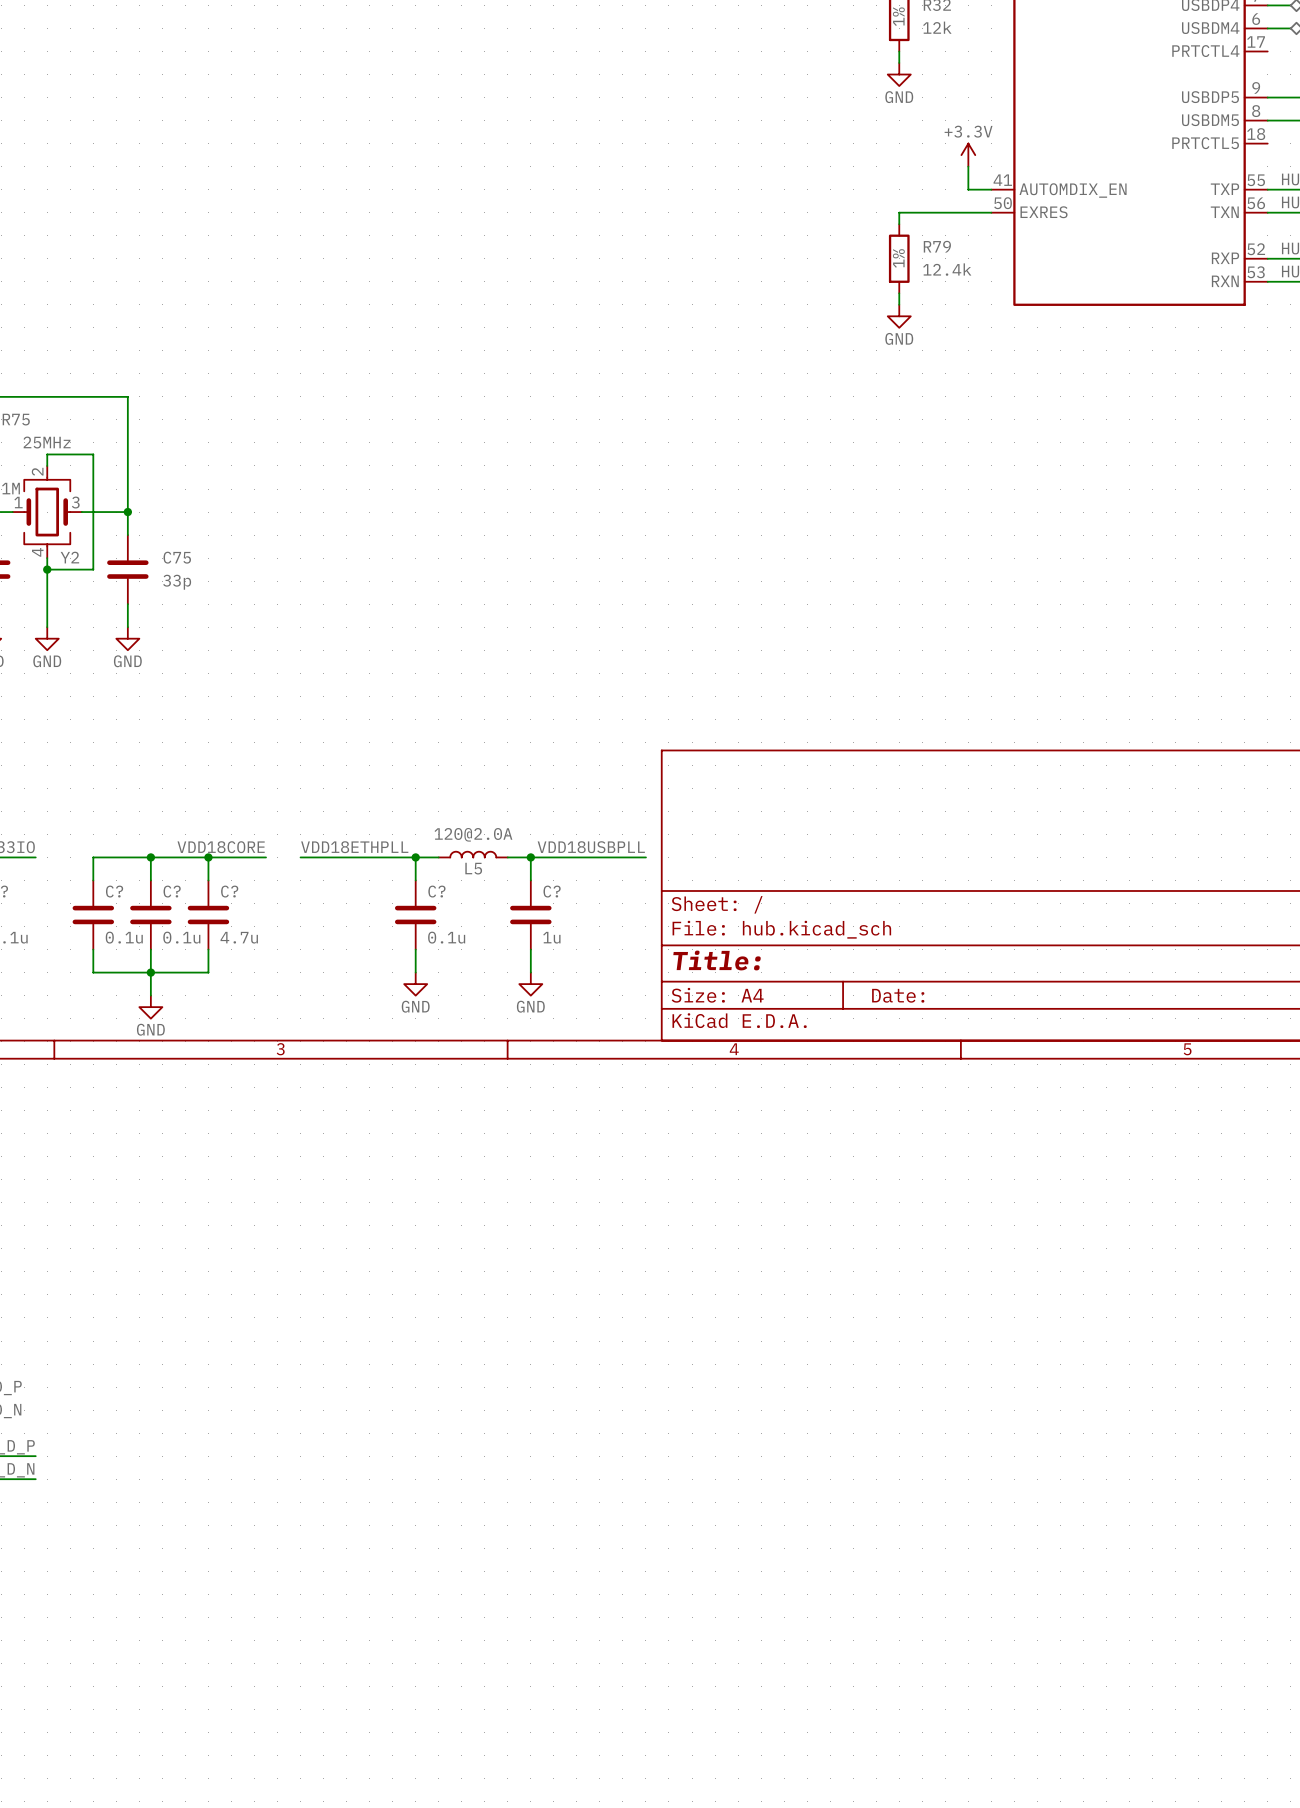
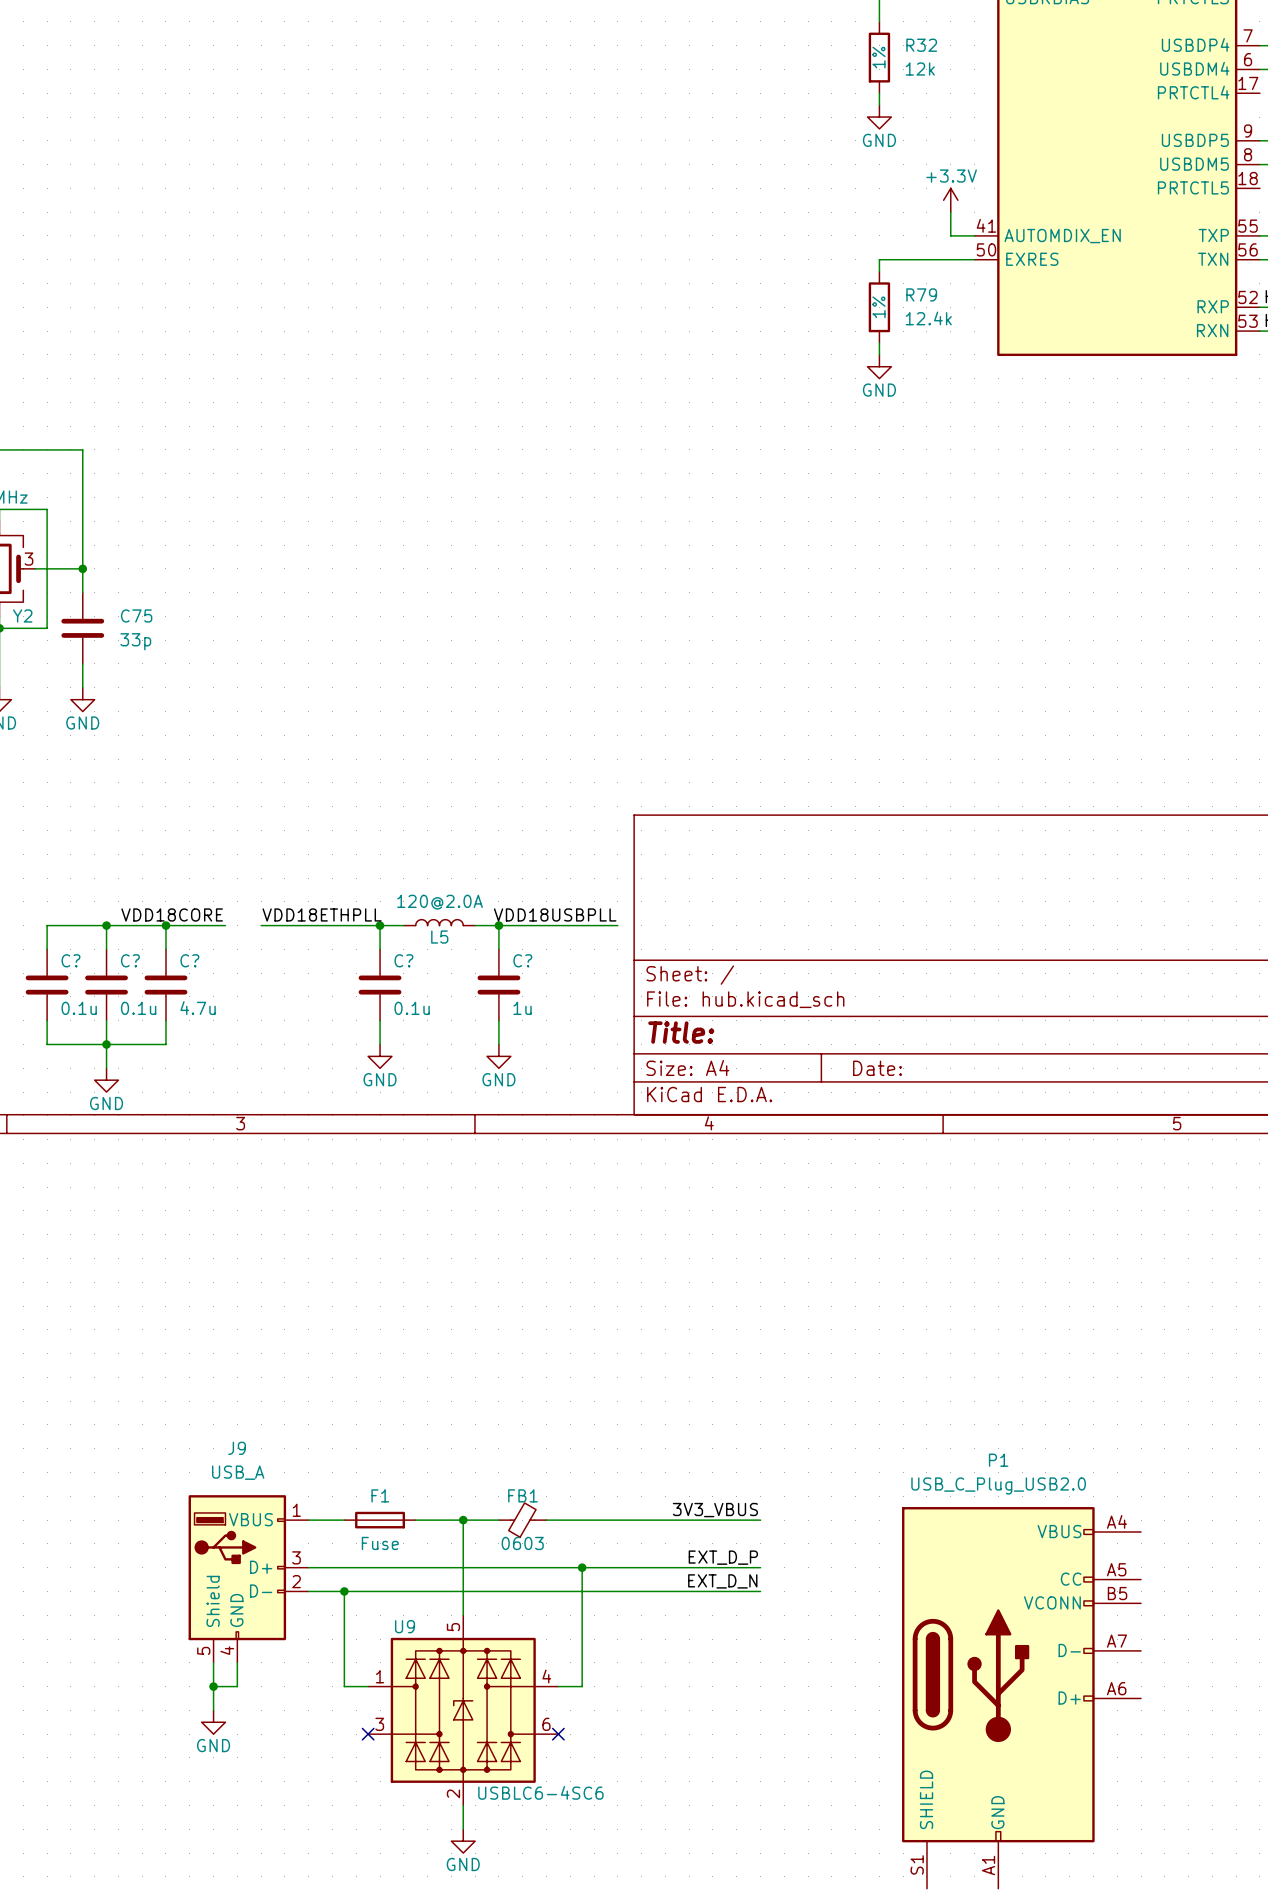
label: none -> 3V3_VBUS (715, 1510)
wire: none -> (308, 1520) (344, 1520)
F1: none -> Fuse (380, 1520)
wire: none -> (415, 1520) (498, 1520)
wire: none -> (463, 1520) (463, 1615)
junction: none -> (463, 1520)
FB1: none -> 0603 (522, 1520)
wire: none -> (546, 1520) (760, 1520)
label: none -> EXT_D_P (723, 1557)
wire: none -> (308, 1567) (760, 1567)
wire: none -> (582, 1567) (582, 1686) (558, 1686)
junction: none -> (582, 1567)
J9: none -> USB_A (248, 1578)
label: none -> EXT_D_N (722, 1581)
wire: none -> (308, 1591) (760, 1591)
wire: none -> (344, 1591) (344, 1686) (368, 1686)
junction: none -> (344, 1591)
wire: none -> (213, 1662) (213, 1710)
wire: none -> (237, 1662) (237, 1686) (213, 1686)
junction: none -> (213, 1686)
P1: none -> USB_C_Plug_USB2.0 (1021, 1697)
U9: none -> USBLC6-4SC6 (463, 1710)
power symbol: none -> GND (213, 1722)
no-connect mark: none -> (368, 1734)
no-connect mark: none -> (558, 1734)
wire: none -> (463, 1805) (463, 1829)
power symbol: none -> GND (463, 1841)

